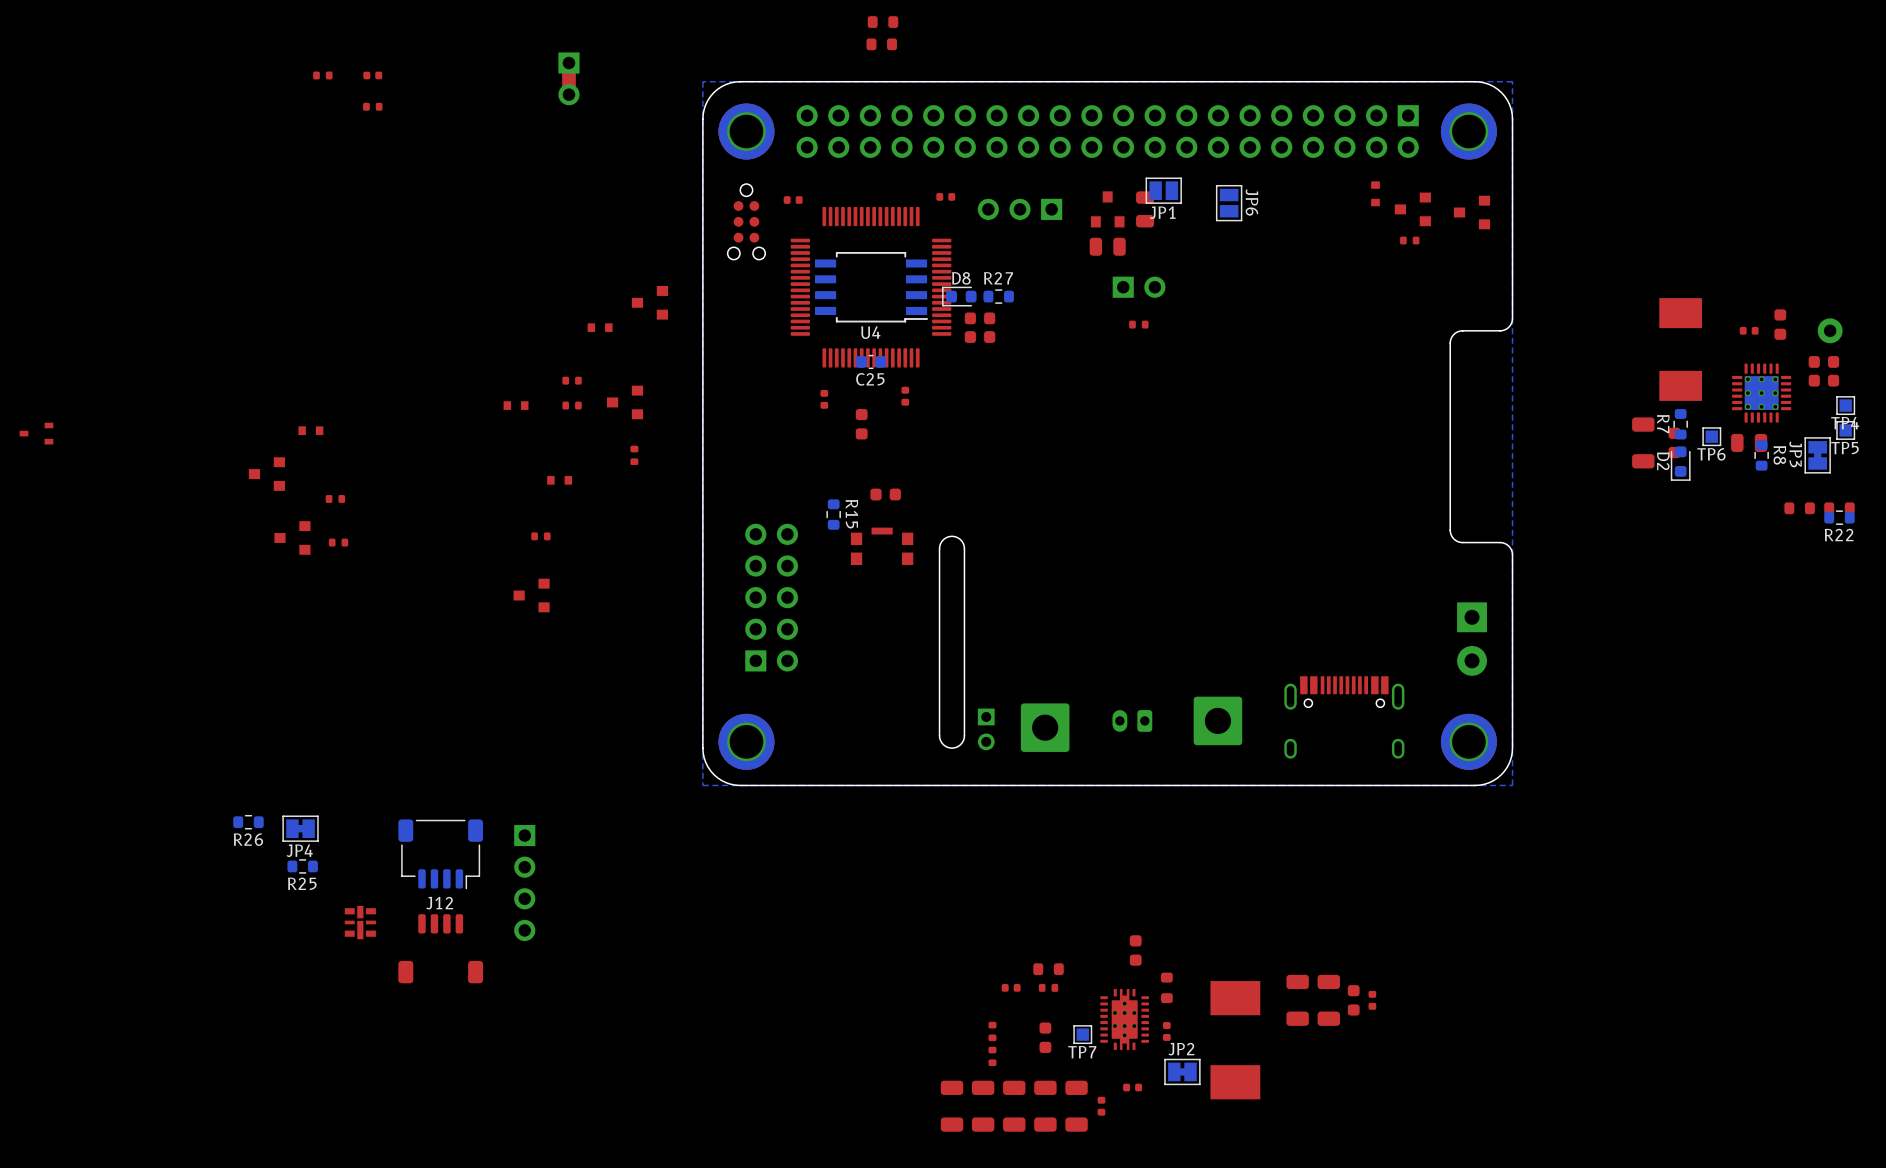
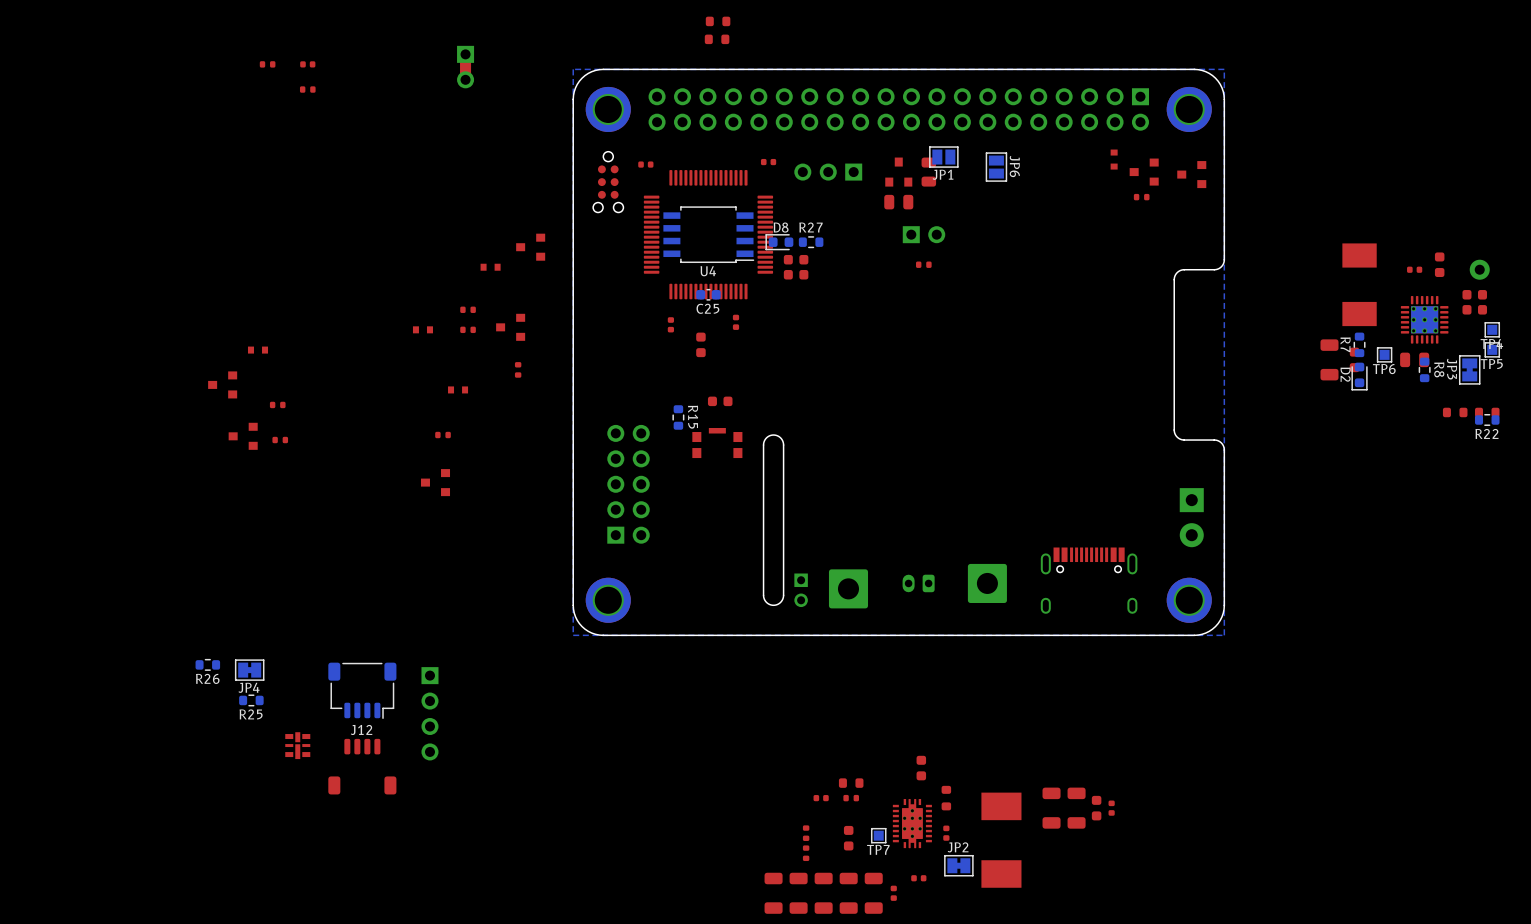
part: (36, 433) -> none

